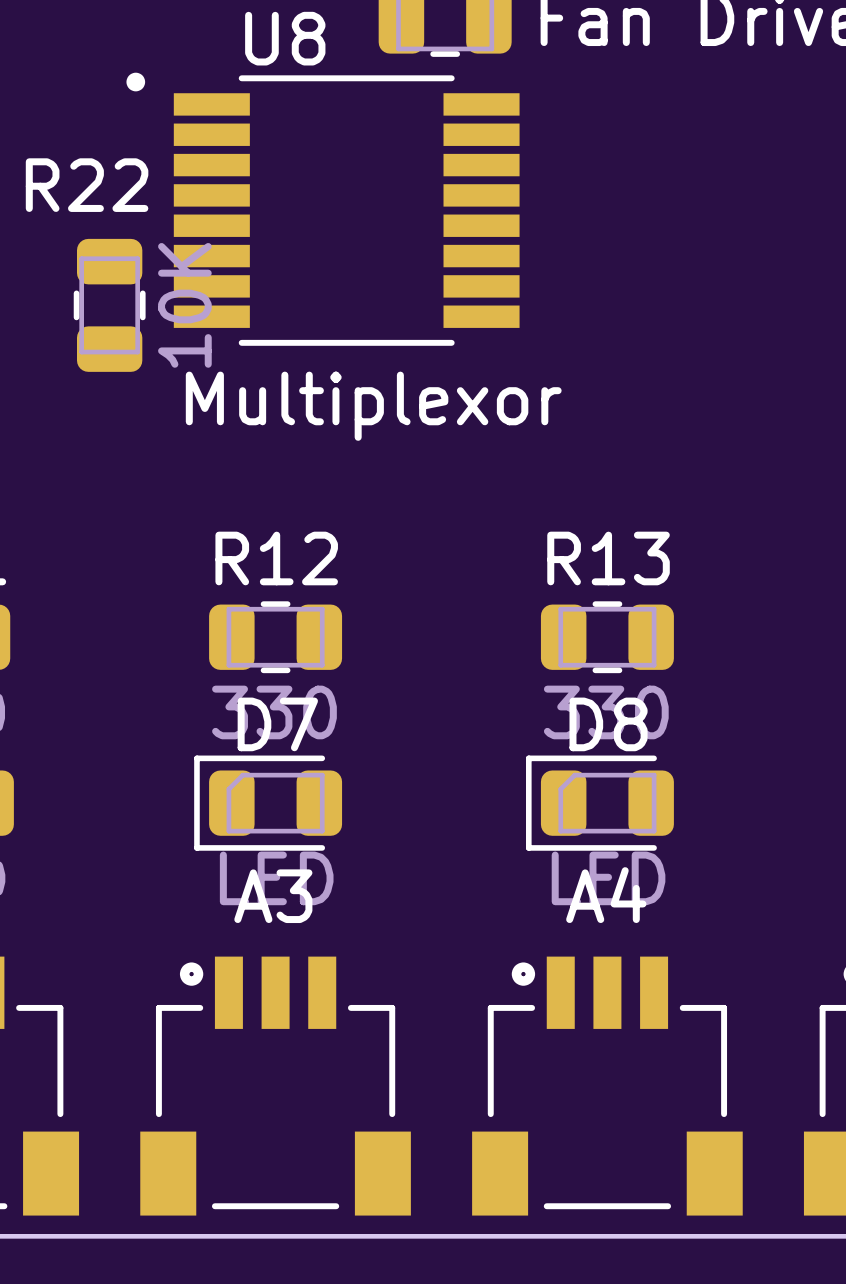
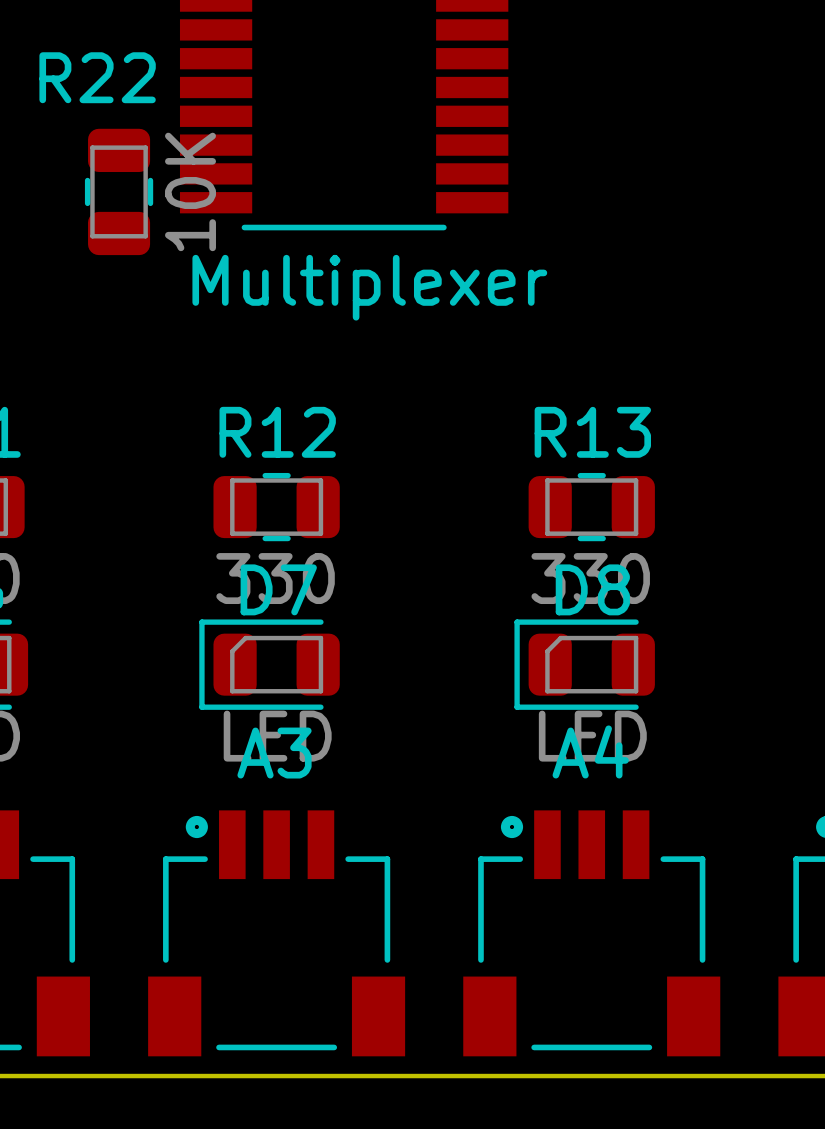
U8 value: Multiplexor (373, 406) -> Multiplexer (369, 287)

